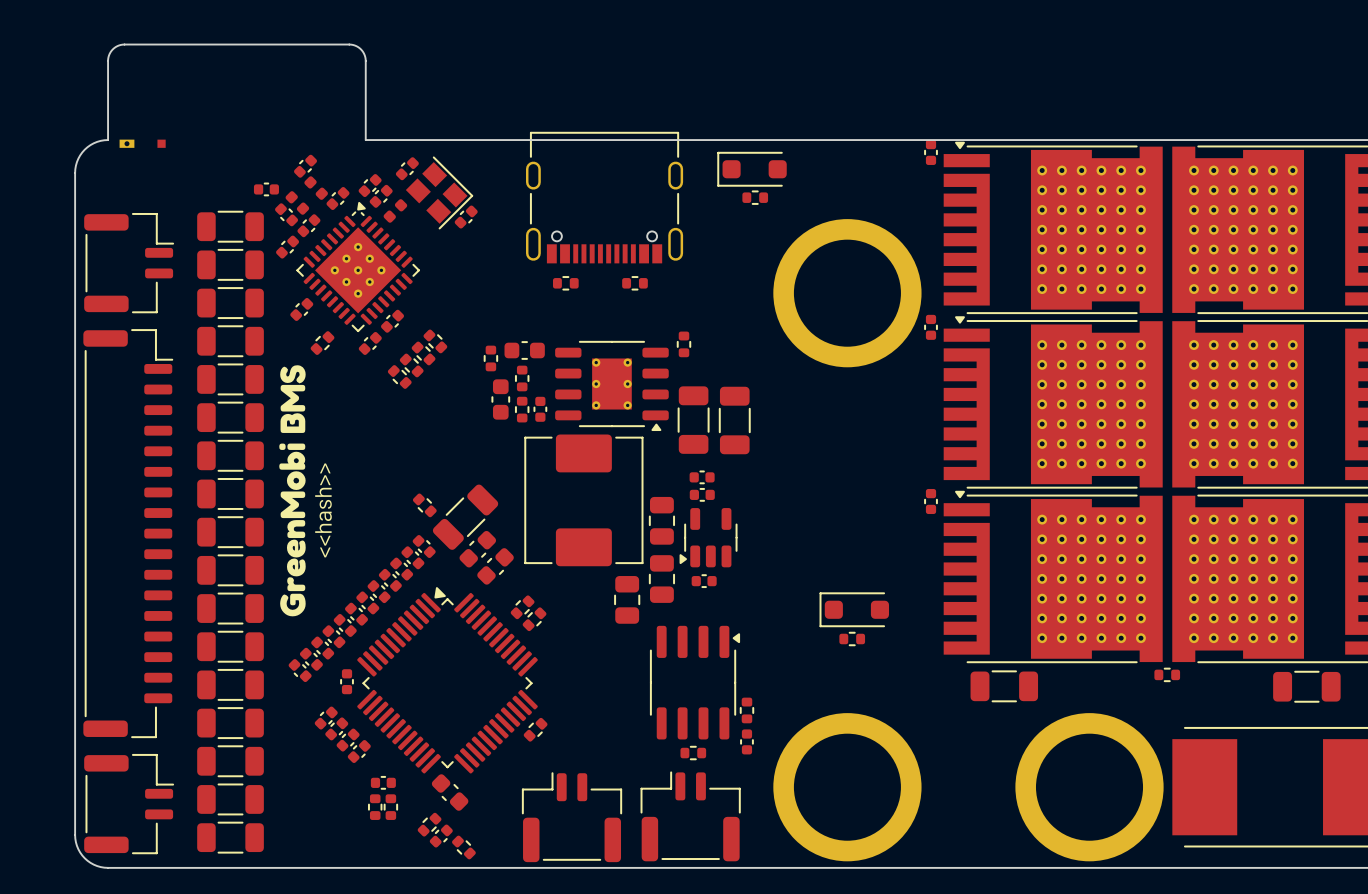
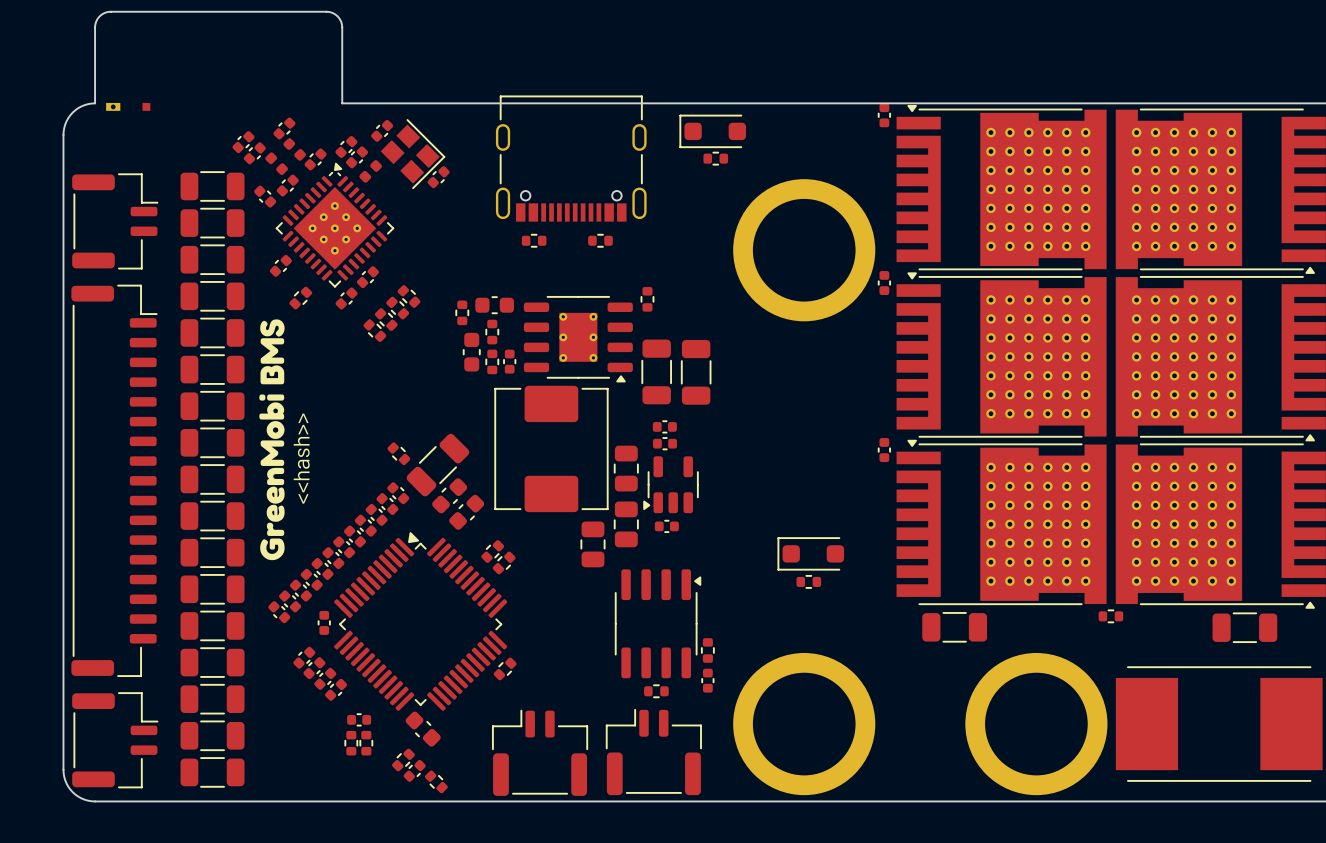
part: none -> (243, 142)
part: (266, 189) -> none
part: none -> (254, 153)
part: (286, 214) -> none
part rotation: 0° (287, 247) -> 90° clockwise (265, 196)

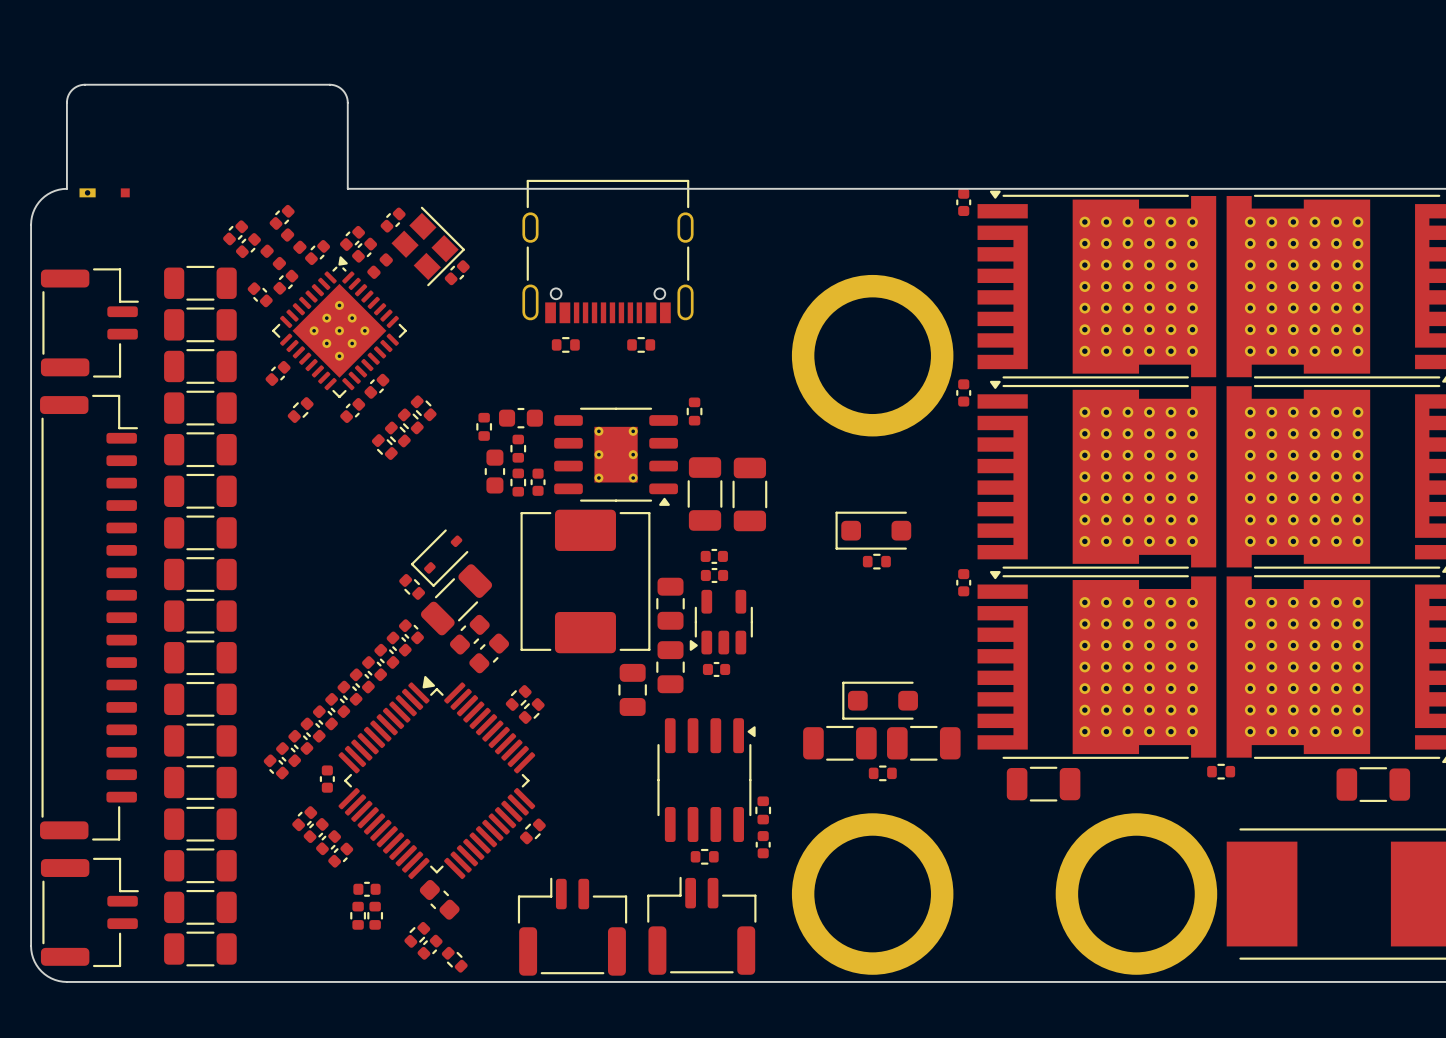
part position: (712, 131) -> (873, 530)
part: (715, 158) -> none
drawing: [259, 319, 285, 561] -> none
part: none -> (439, 558)
part: none -> (876, 561)
text: <<hash>> (301, 458) -> none
part position: (808, 581) -> (882, 773)
part: none -> (839, 743)
part: none -> (923, 743)

